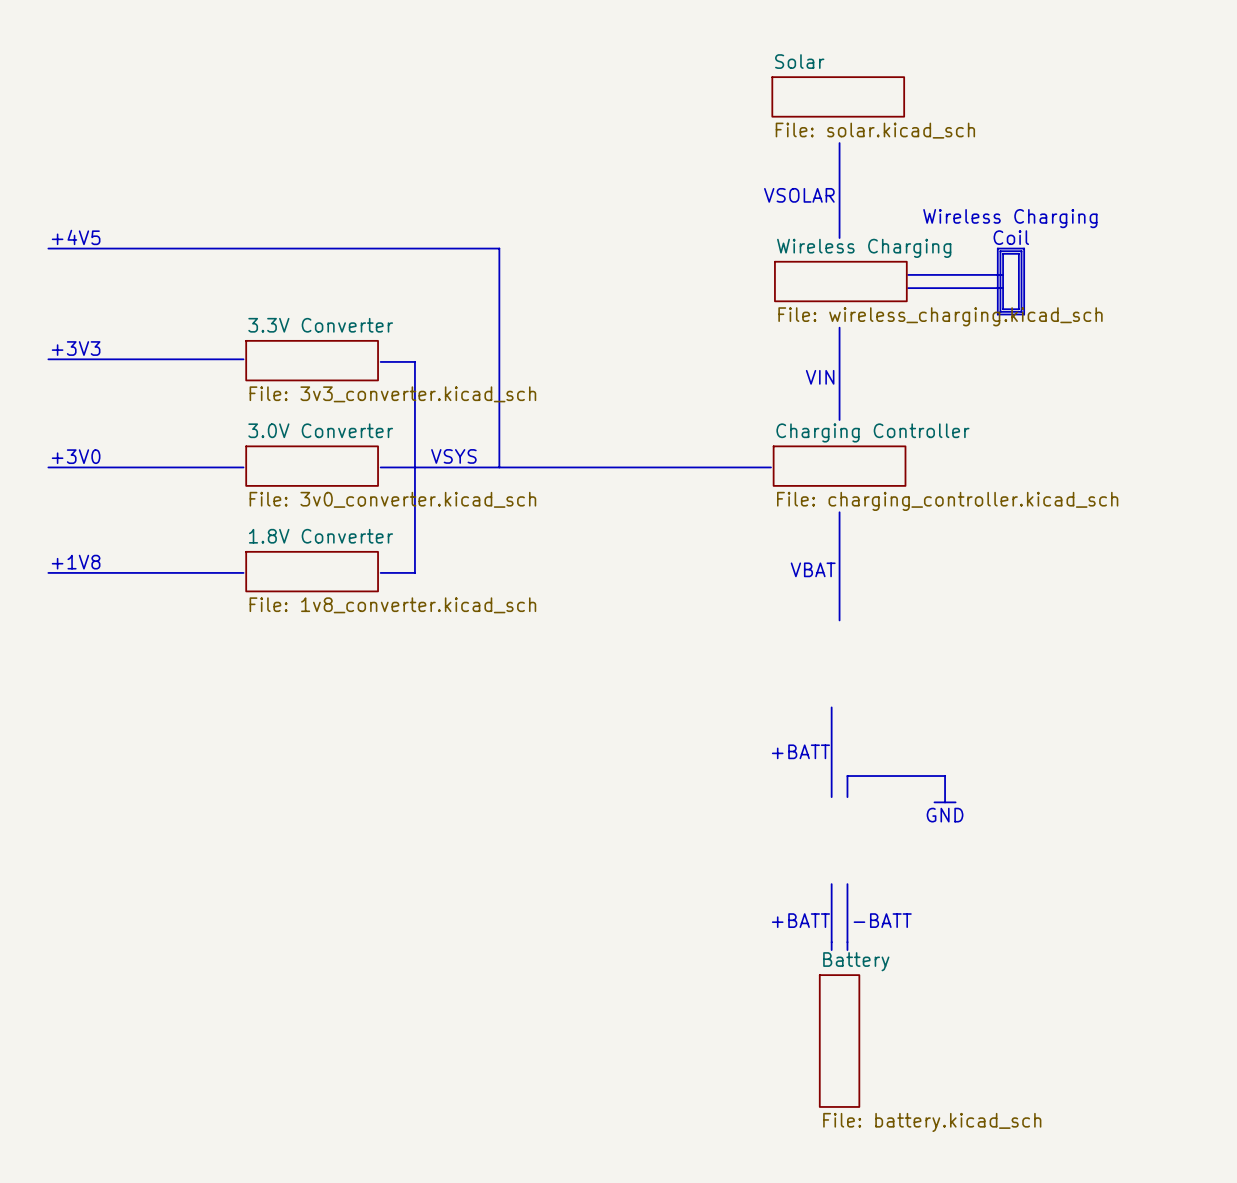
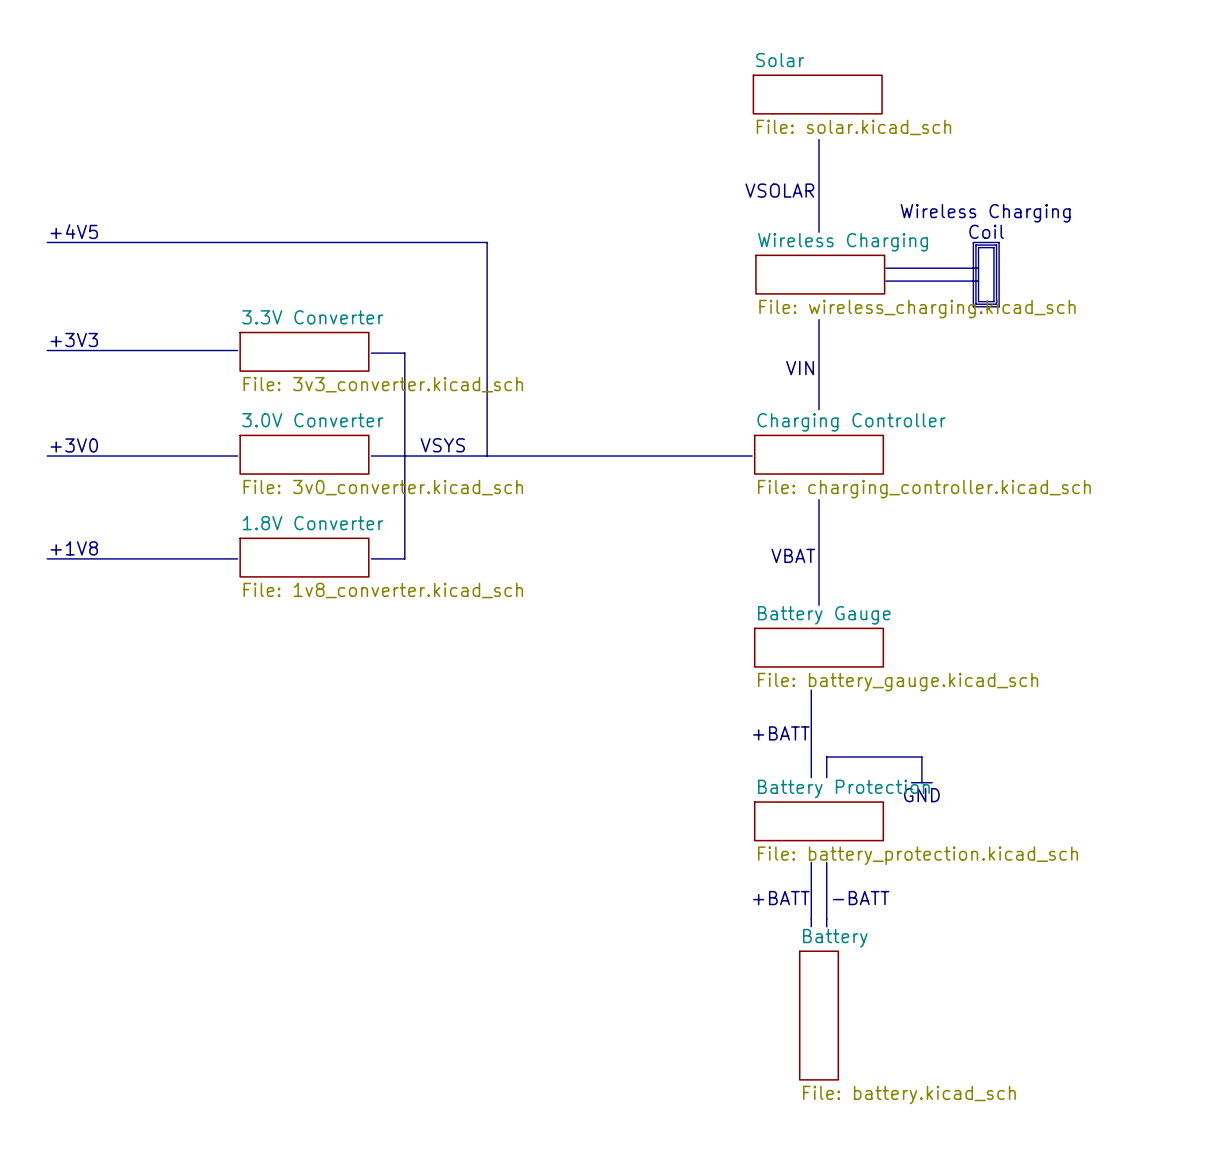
sheet Battery Gauge: none -> File: battery_gauge.kicad_sch (819, 647)
sheet Battery Protection: none -> File: battery_protection.kicad_sch (819, 821)

